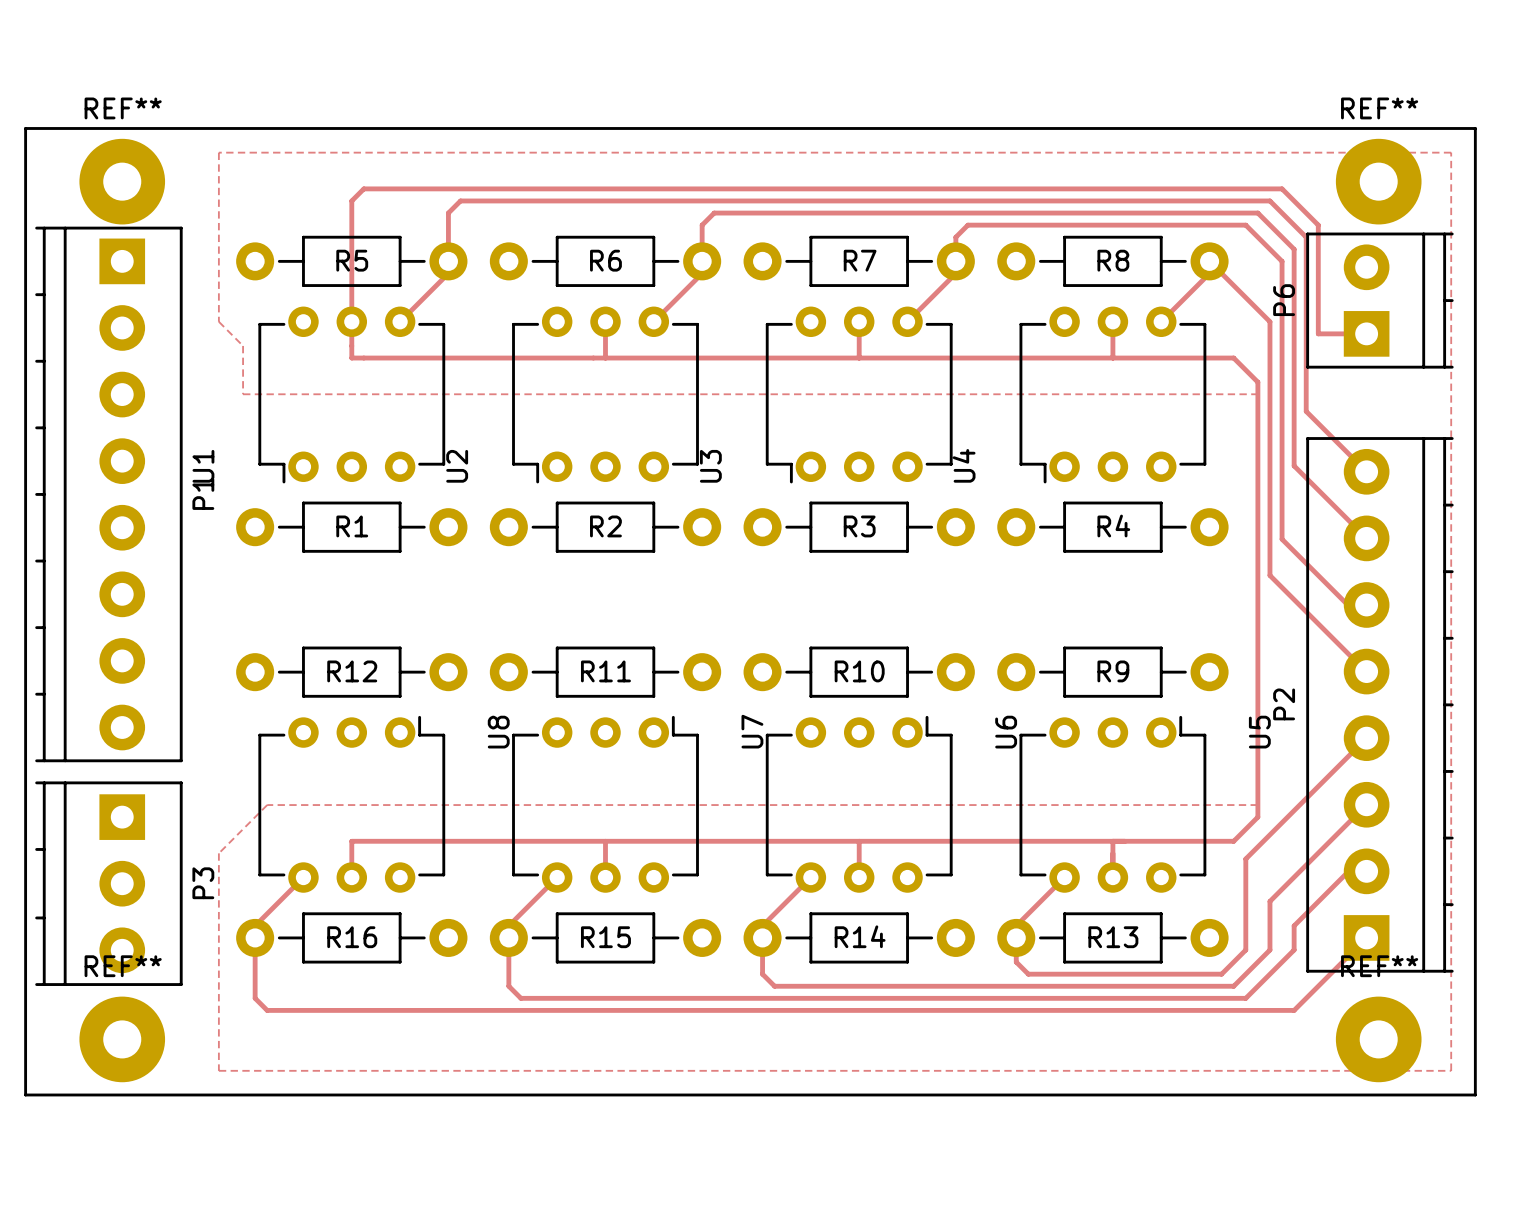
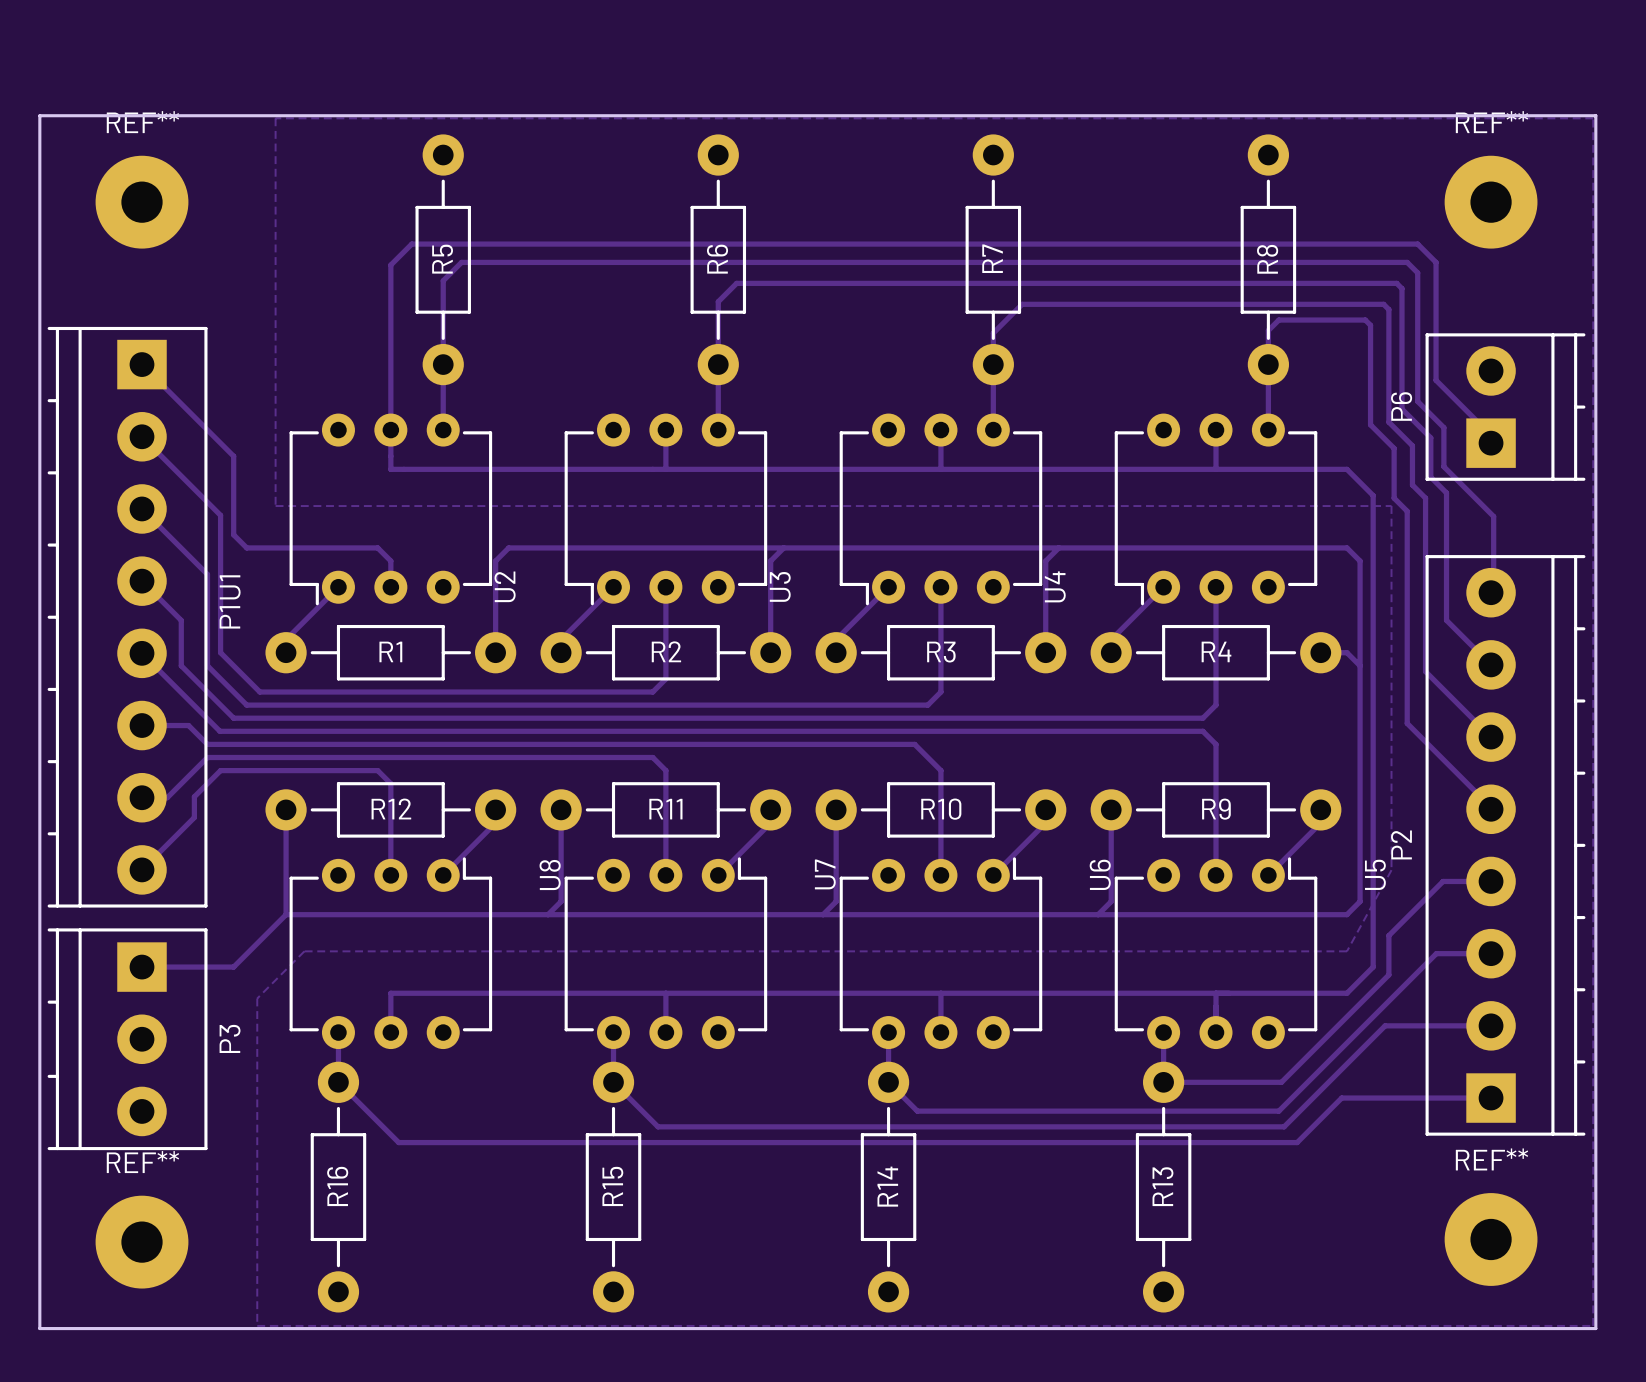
board edge: (25, 128) (25, 1094) (1475, 1094) (1475, 128) (25, 128) -> (39, 115) (39, 1328) (1595, 1328) (1595, 115) (39, 115)
zone outline: (218, 152) (1451, 152) (1451, 1070) (218, 1070) (218, 853) (267, 805) (1257, 805) (1257, 394) (243, 394) (243, 345) (218, 321) (218, 152) -> (275, 118) (275, 506) (1391, 506) (1391, 870) (1346, 951) (304, 951) (257, 998) (257, 1325) (1593, 1325) (1593, 118) (275, 118)
REF** position: (122, 181) -> (142, 202)
REF** position: (1378, 181) -> (1491, 202)
track: (1282, 188) (363, 188) (351, 200) -> (1491, 443) (1491, 435) (1436, 380) (1436, 262) (1417, 244) (411, 244) (390, 265) (390, 299)
track: (1284, 191) (1318, 225) (1318, 333) (1366, 333) -> (1401, 288) (1401, 409) (1430, 437) (1430, 477) (1446, 492) (1446, 620)
track: none -> (142, 364) (233, 456) (233, 534) (246, 547) (377, 547) (390, 561) (390, 587)
R5 rotation: 0° (351, 261) -> 90° clockwise (443, 259)
R6 rotation: 0° (605, 261) -> 90° clockwise (718, 259)
R7 rotation: 0° (859, 261) -> 90° clockwise (993, 259)
R8 rotation: 0° (1112, 261) -> 90° clockwise (1268, 259)
track: (400, 321) (448, 273) (448, 213) (460, 200) (1269, 200) (1306, 237) (1306, 384) -> (443, 430) (443, 280) (461, 262) (1407, 262) (1417, 272) (1417, 401) (1443, 427) (1443, 466) (1493, 516) (1493, 590) (1491, 592)
track: (653, 321) (702, 273) (702, 225) (714, 213) (1257, 213) (1294, 249) (1294, 336) -> (718, 430) (718, 301) (736, 283) (1396, 283) (1399, 285)
track: (907, 321) (955, 273) (955, 237) (967, 225) (1245, 225) (1282, 261) (1282, 539) (1347, 604) -> (993, 430) (993, 333) (1022, 304) (1383, 304) (1388, 309) (1388, 422) (1412, 445)
track: (1161, 321) (1209, 273) (1209, 261) (1269, 321) (1269, 575) (1366, 671) -> (1268, 430) (1268, 330) (1278, 320) (1365, 320) (1370, 325) (1370, 424) (1394, 448) (1394, 498) (1407, 511) (1407, 723) (1491, 809)
track: none -> (142, 436) (220, 515) (220, 652) (259, 692) (652, 692) (665, 678) (665, 587)
track: (1294, 372) (1294, 465) (1325, 497) -> (1412, 485) (1425, 498)
track: none -> (142, 508) (207, 574) (207, 665) (246, 705) (927, 705) (940, 692) (940, 587)
track: (1306, 411) (1366, 471) -> (1425, 527) (1425, 671) (1491, 737)
track: none -> (783, 547) (770, 561) (770, 652)
track: none -> (1058, 547) (1045, 561) (1045, 652)
track: none -> (142, 581) (181, 620) (181, 665) (233, 718) (1202, 718) (1216, 705) (1216, 587)
track: none -> (338, 587) (286, 639) (286, 652)
track: none -> (613, 587) (561, 639) (561, 652)
track: none -> (888, 587) (836, 639) (836, 652)
track: none -> (1163, 587) (1111, 639) (1111, 652)
track: none -> (142, 653) (219, 731) (1202, 731) (1216, 744) (1216, 875)
track: none -> (495, 652) (495, 561) (508, 547) (1346, 547) (1360, 561) (1360, 901) (1346, 914) (286, 914)
track: none -> (1320, 652) (1346, 652) (1360, 665)
track: none -> (142, 725) (188, 725) (207, 744) (914, 744) (940, 770) (940, 875)
track: none -> (142, 797) (167, 797) (207, 757) (652, 757) (665, 770) (665, 862)
track: none -> (286, 809) (286, 914)
track: none -> (495, 809) (495, 822) (443, 875)
track: none -> (561, 809) (561, 901) (548, 914)
track: none -> (770, 809) (770, 822) (718, 875)
track: none -> (836, 809) (836, 901) (823, 914)
track: none -> (1045, 809) (1045, 822) (993, 875)
track: none -> (1111, 809) (1111, 901) (1098, 914)
track: none -> (1320, 809) (1320, 822) (1268, 875)
track: none -> (142, 869) (194, 817) (194, 796) (220, 770) (377, 770) (390, 783) (390, 875)
track: (1366, 738) (1245, 858) (1245, 950) (1221, 974) (1028, 974) (1016, 962) (1016, 925) (1064, 877) -> (1491, 881) (1443, 881) (1388, 935) (1388, 974) (1281, 1082) (1163, 1082) (1163, 1032)
track: none -> (286, 914) (233, 967) (142, 967)
track: (1366, 804) (1269, 901) (1269, 950) (1233, 986) (774, 986) (762, 974) (762, 925) (810, 877) -> (1491, 953) (1436, 953) (1278, 1111) (917, 1111) (888, 1082) (888, 1032)
track: (1348, 871) (1294, 925) (1294, 950) (1245, 998) (520, 998) (508, 986) (508, 925) (557, 877) -> (1471, 1025) (1385, 1025) (1284, 1126) (658, 1126) (613, 1082) (613, 1032)
track: (303, 877) (255, 925) (255, 998) (267, 1010) (1294, 1010) (1366, 937) -> (338, 1032) (338, 1082) (398, 1142) (1297, 1142) (1341, 1098) (1491, 1098)
R16 rotation: 0° (351, 937) -> 90° clockwise (338, 1187)
R15 rotation: 0° (605, 937) -> 90° clockwise (613, 1187)
R14 rotation: 0° (859, 937) -> 90° clockwise (888, 1187)
R13 rotation: 0° (1112, 937) -> 90° clockwise (1163, 1187)
REF** position: (122, 1039) -> (142, 1242)
REF** position: (1378, 1039) -> (1491, 1239)

